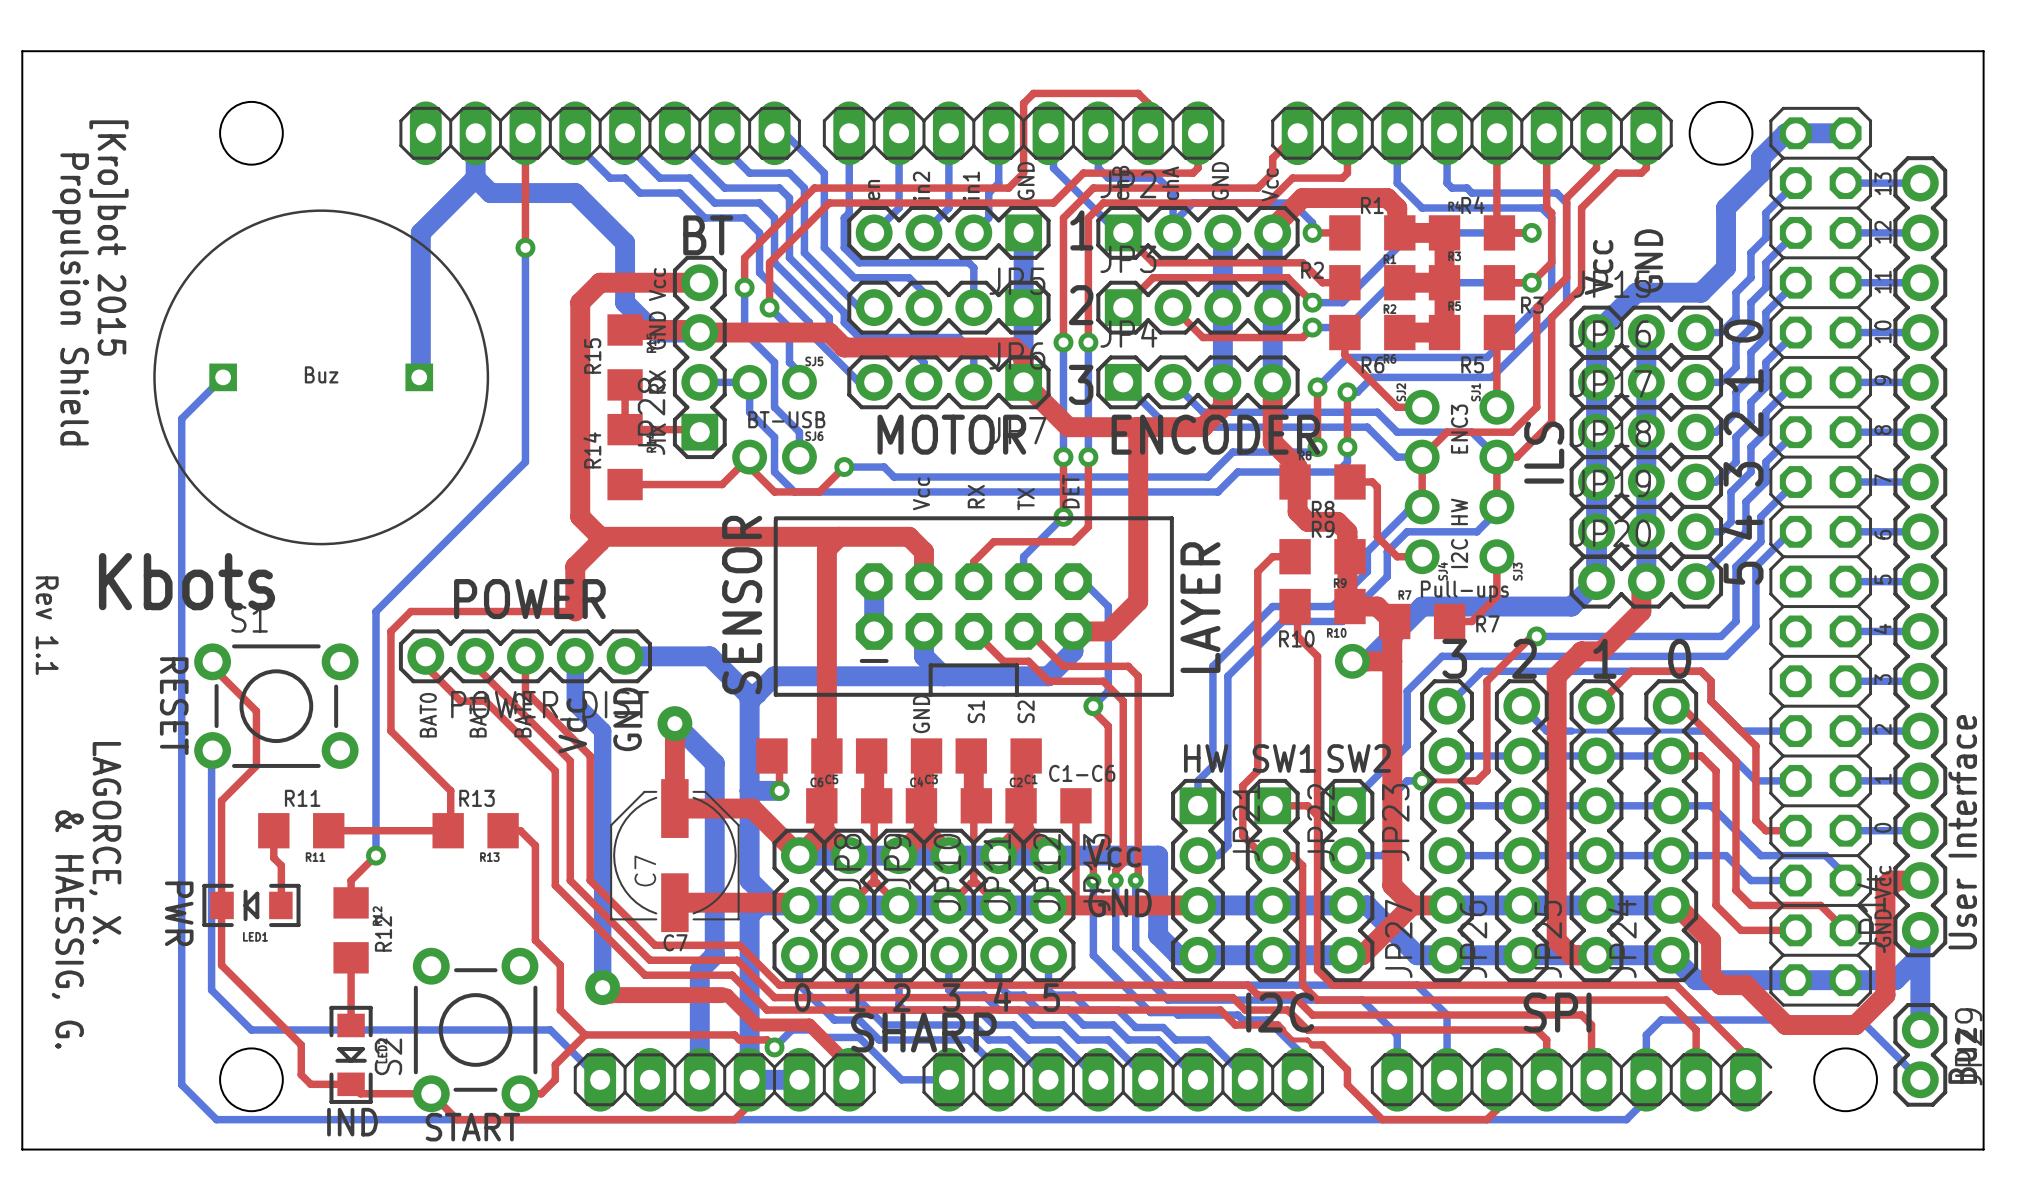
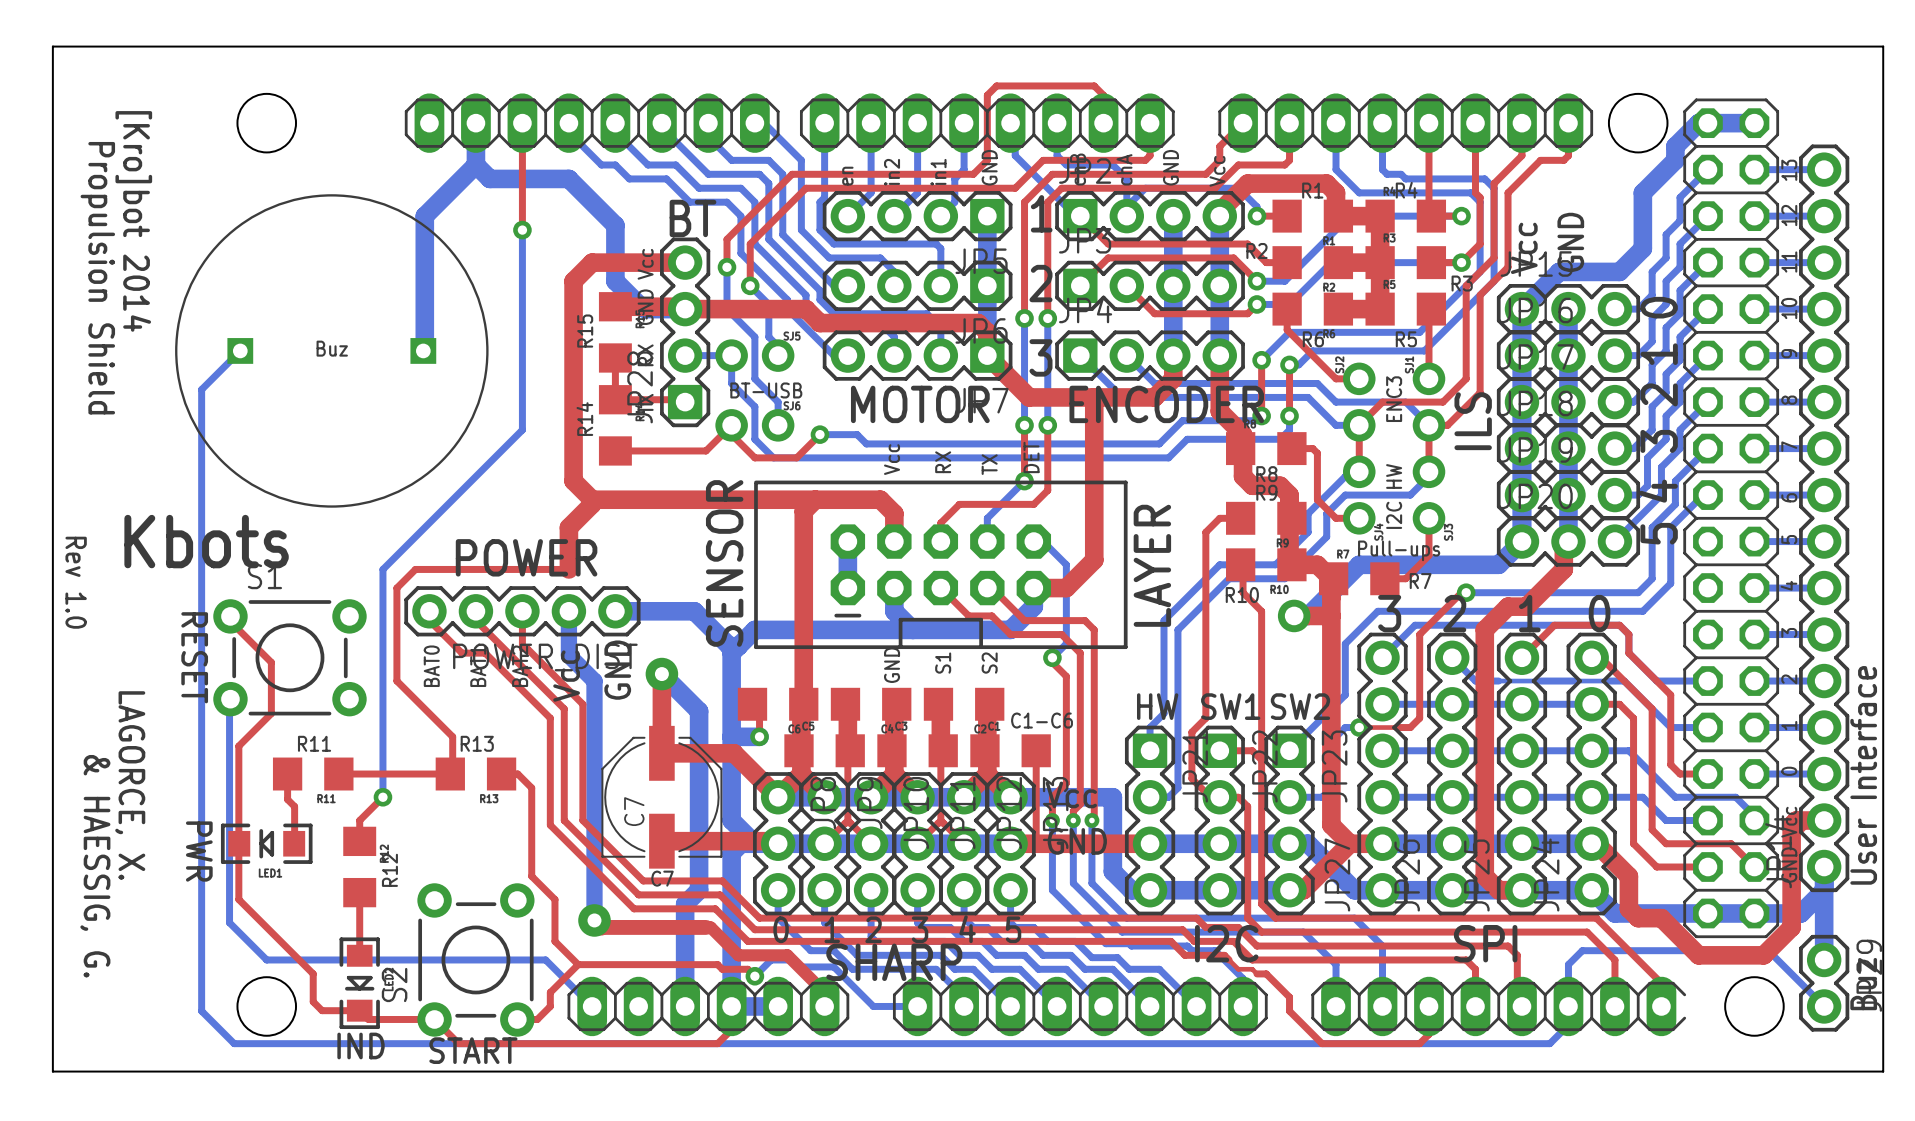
text: [Kro]bot 2015 (109, 238) -> [Kro]bot 2014 (133, 221)
text: Rev 1.1 (47, 625) -> Rev 1.0 (76, 582)

